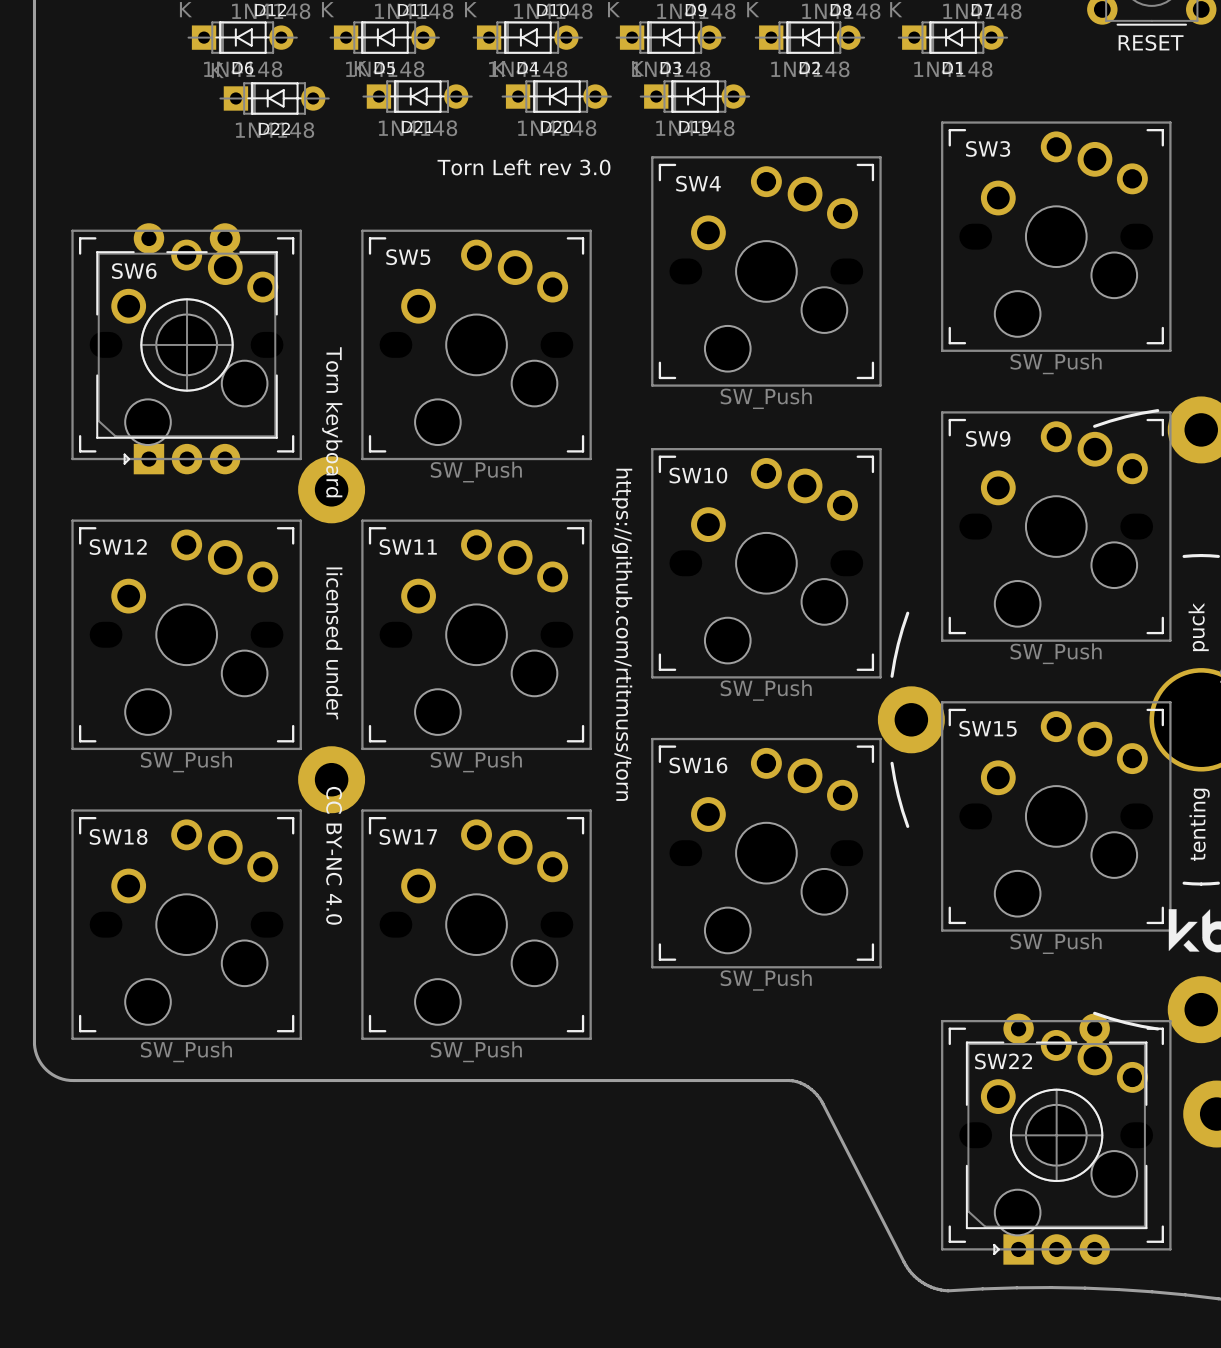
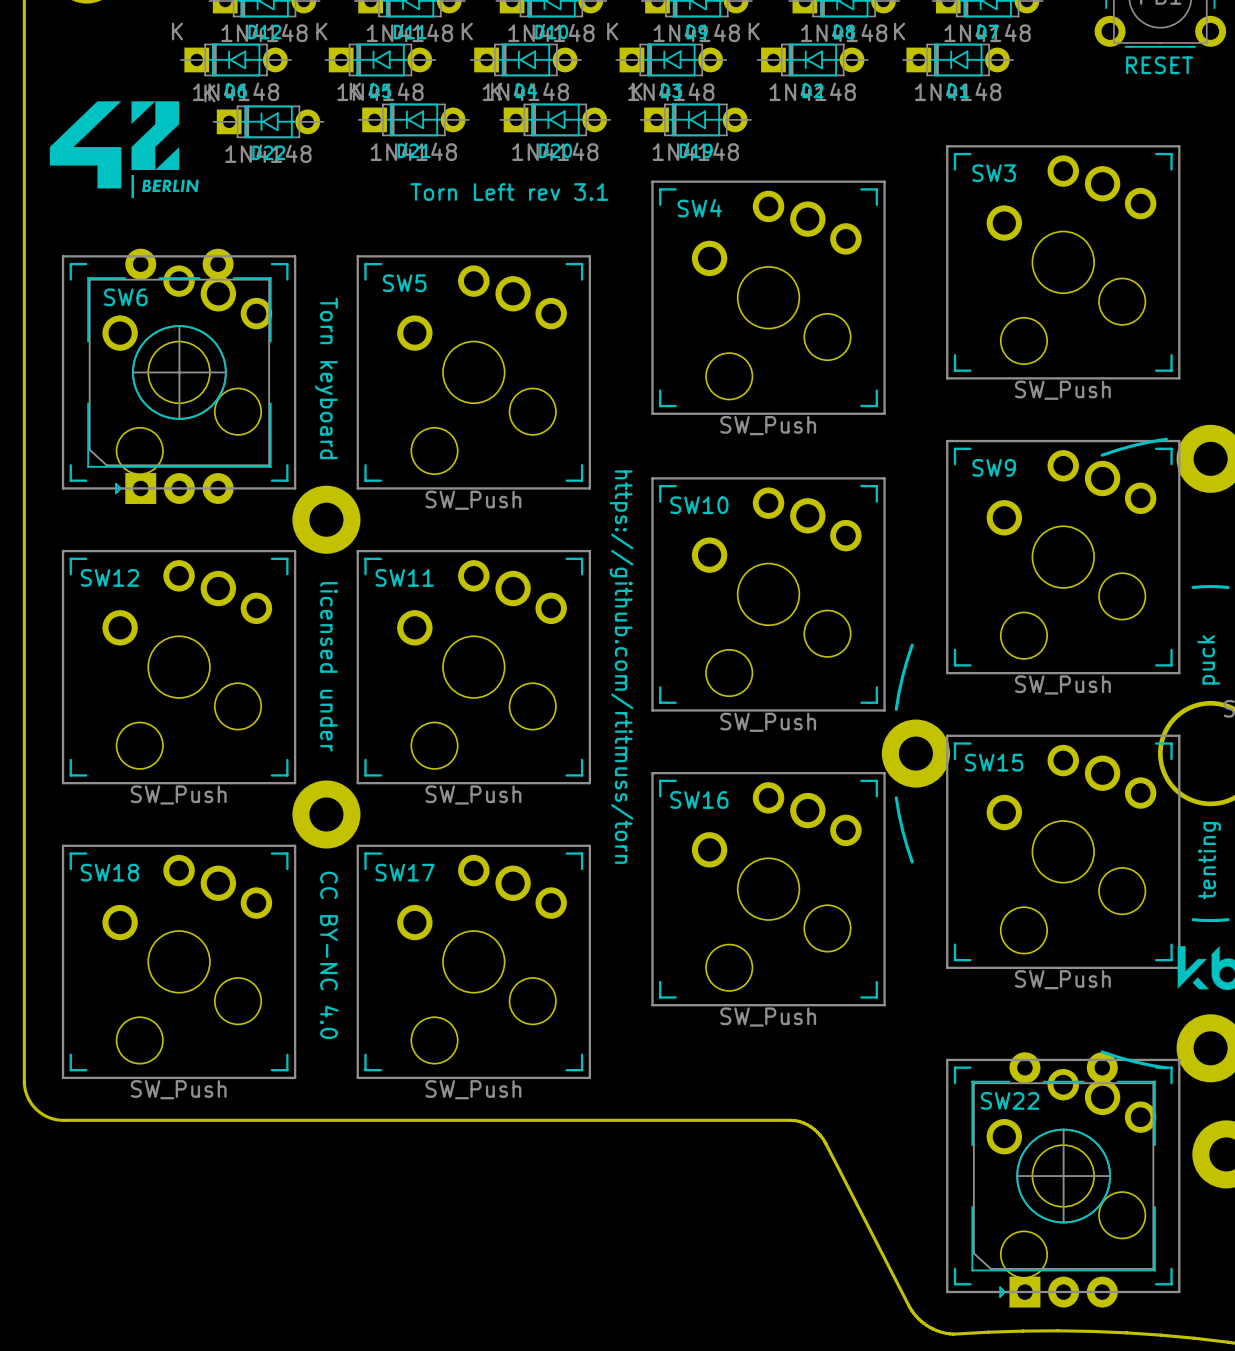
drawing: none -> [49, 101, 199, 199]
text: Torn Left rev 3.0 (523, 167) -> Torn Left rev 3.1 (509, 192)

